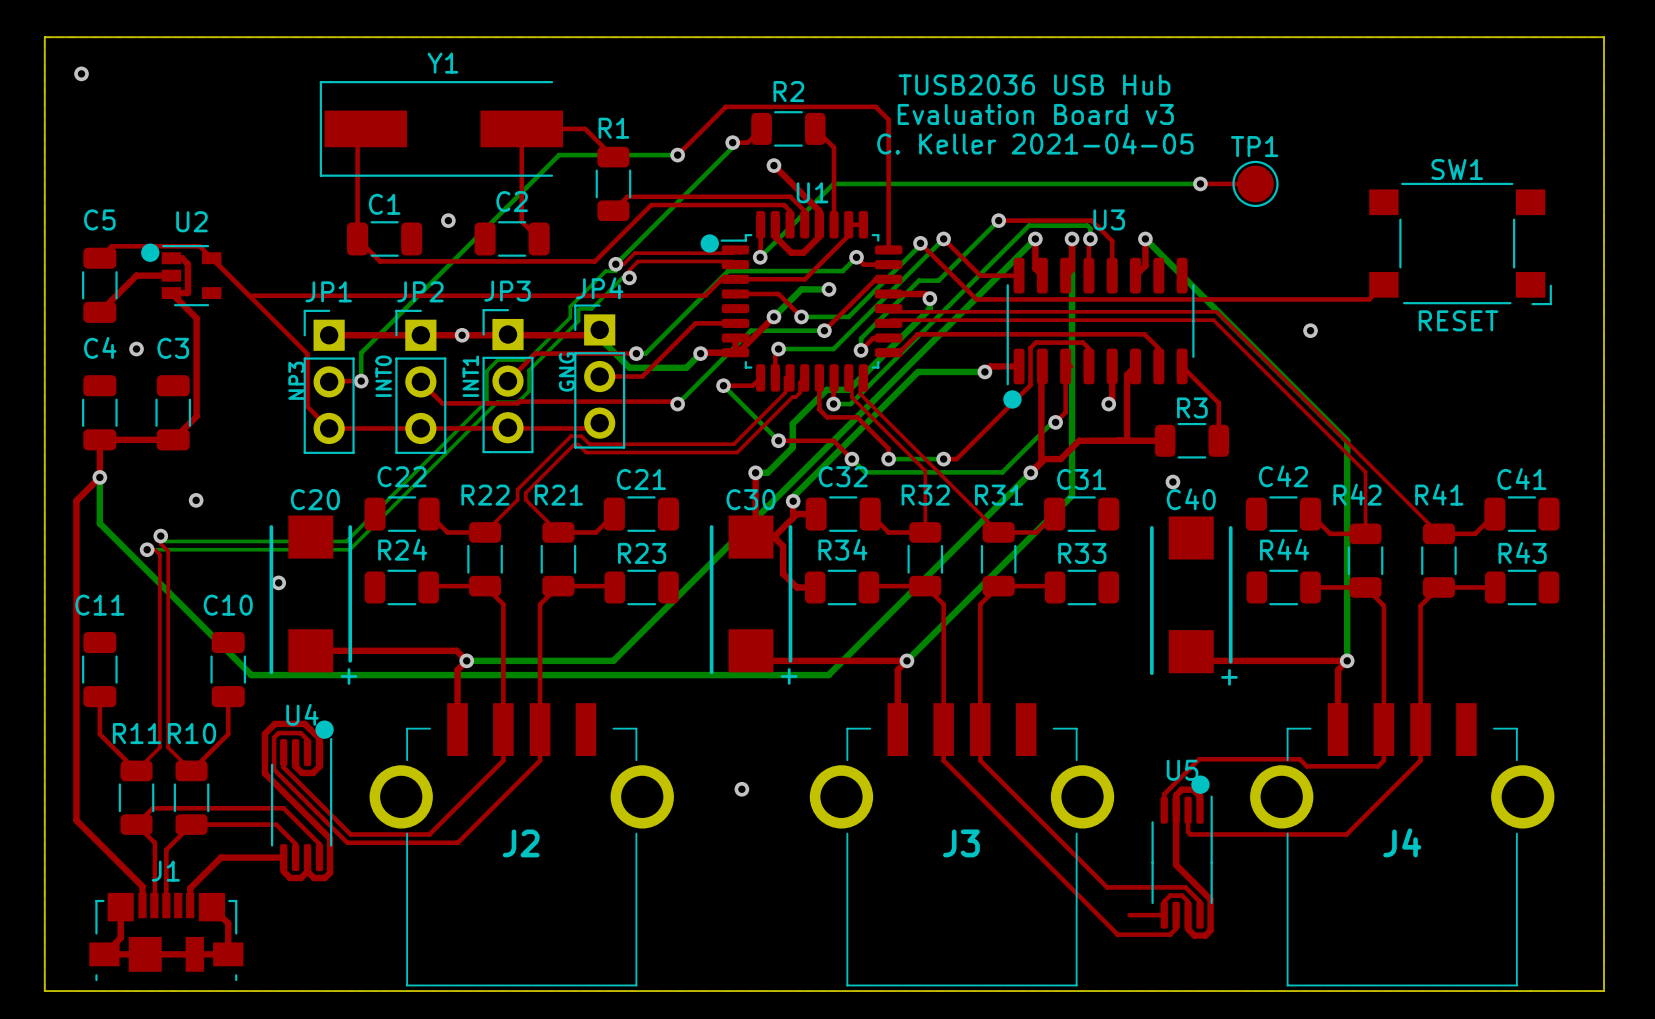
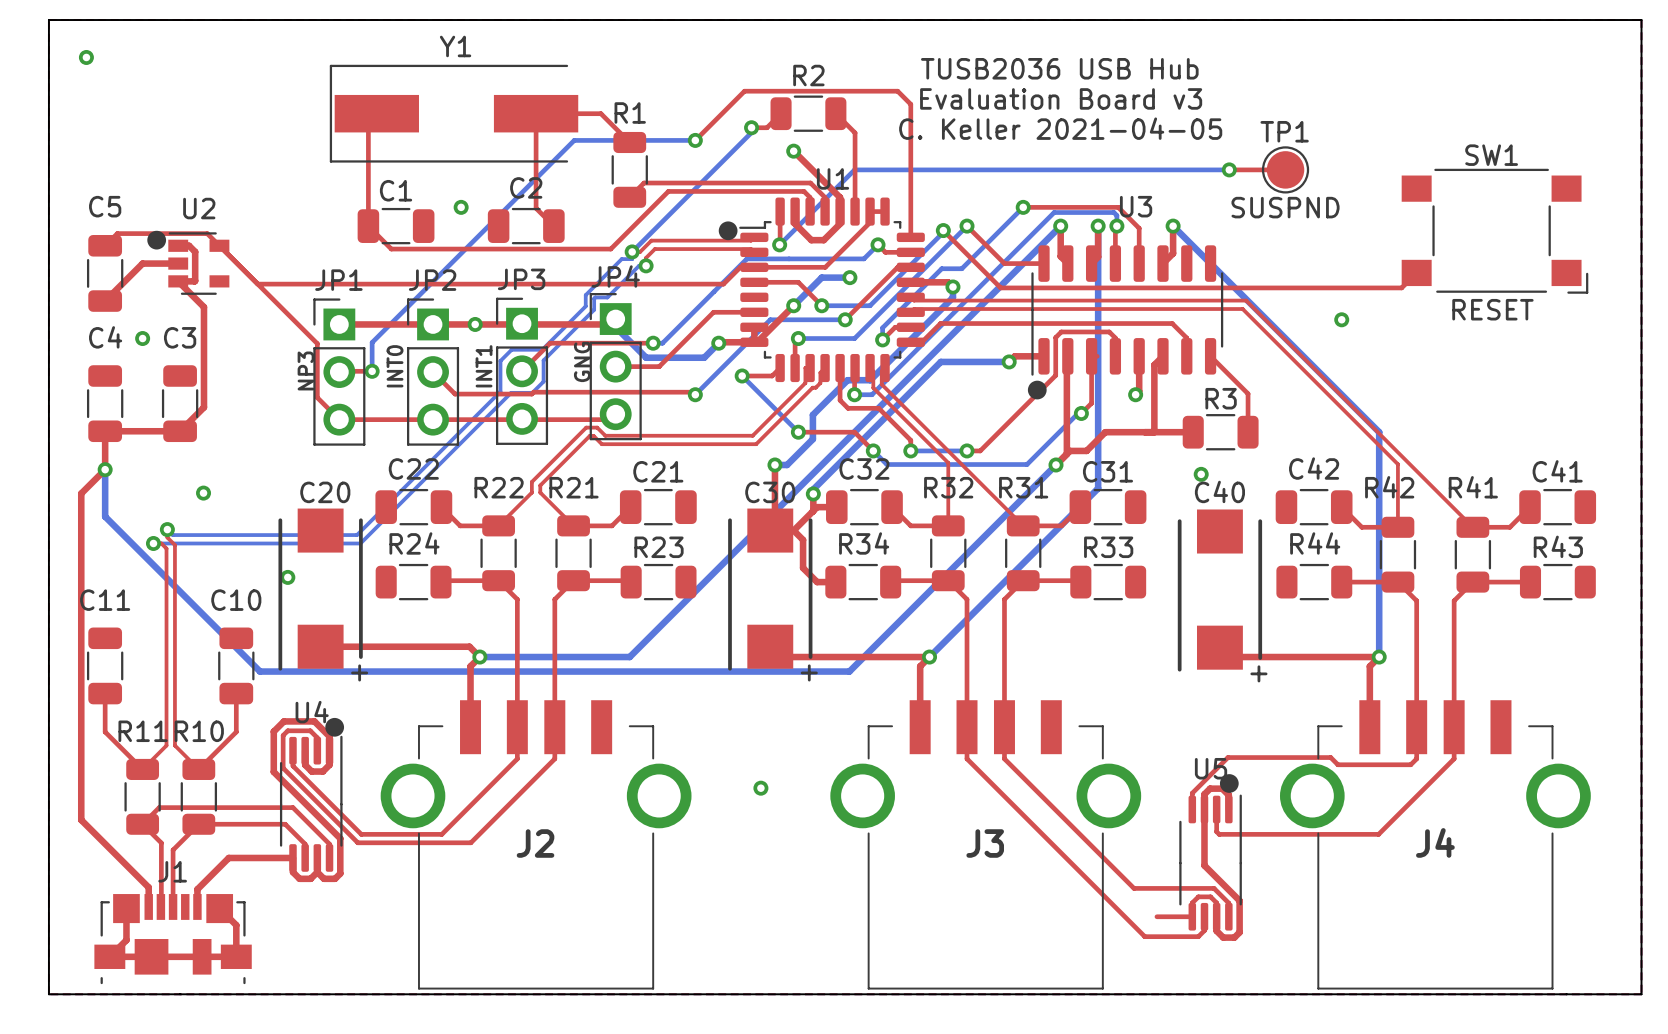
TP1 value: none -> SUSPND (1285, 207)

